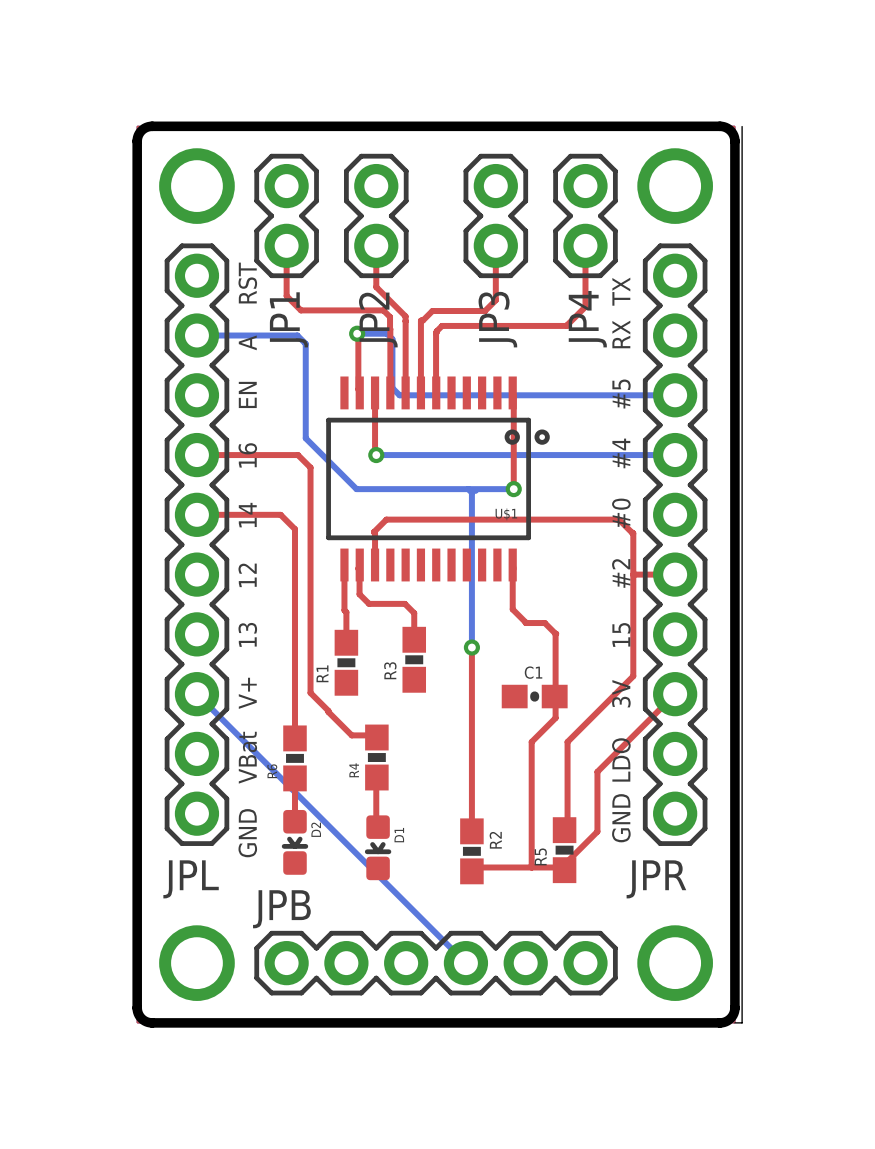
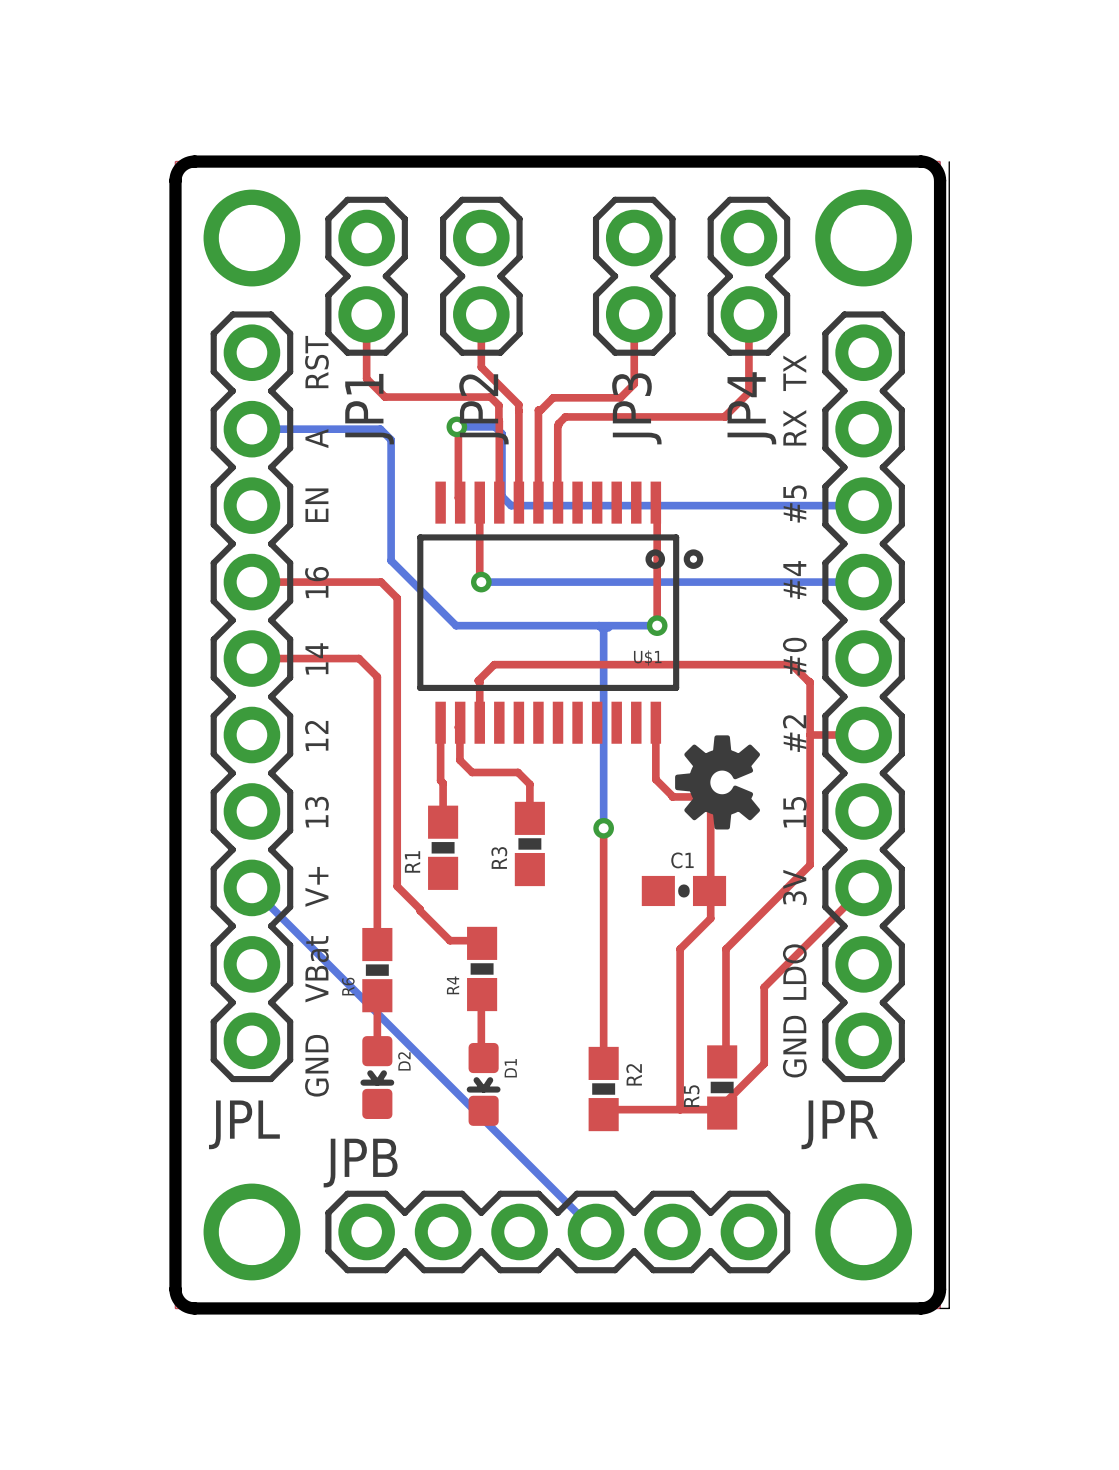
drawing: none -> [675, 735, 761, 830]

